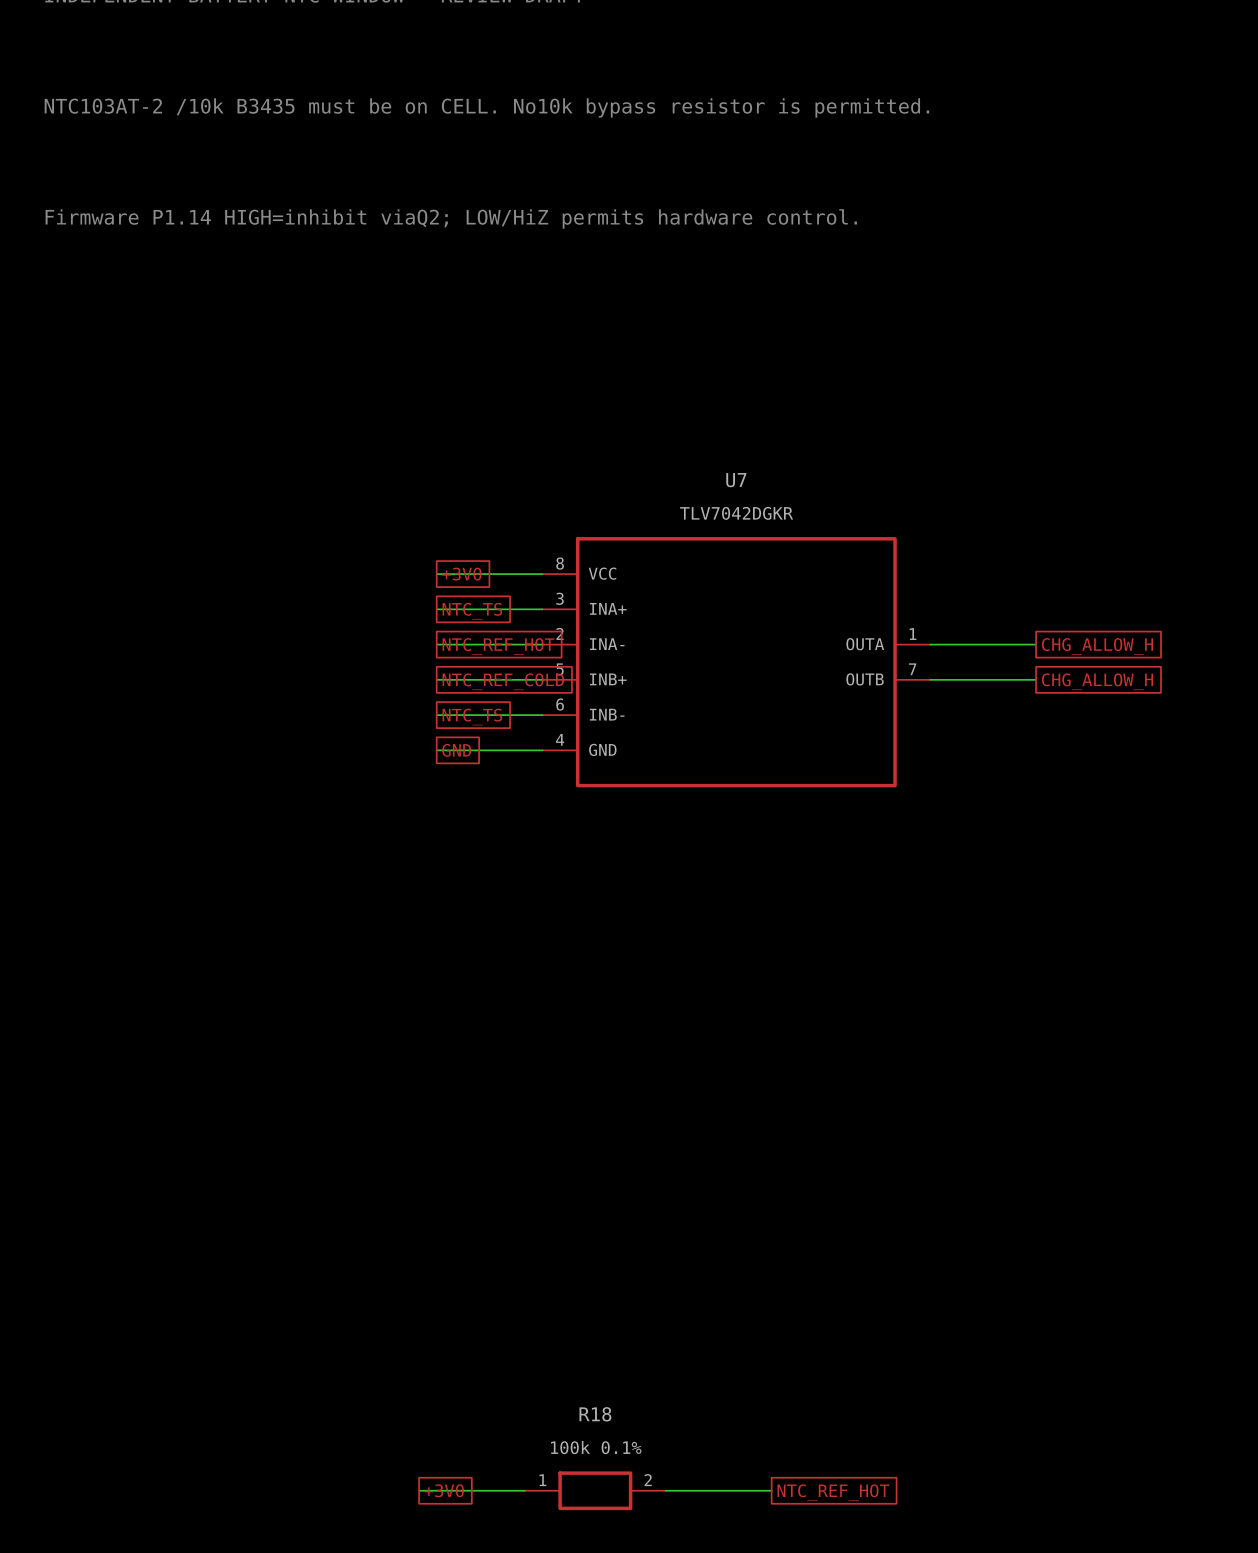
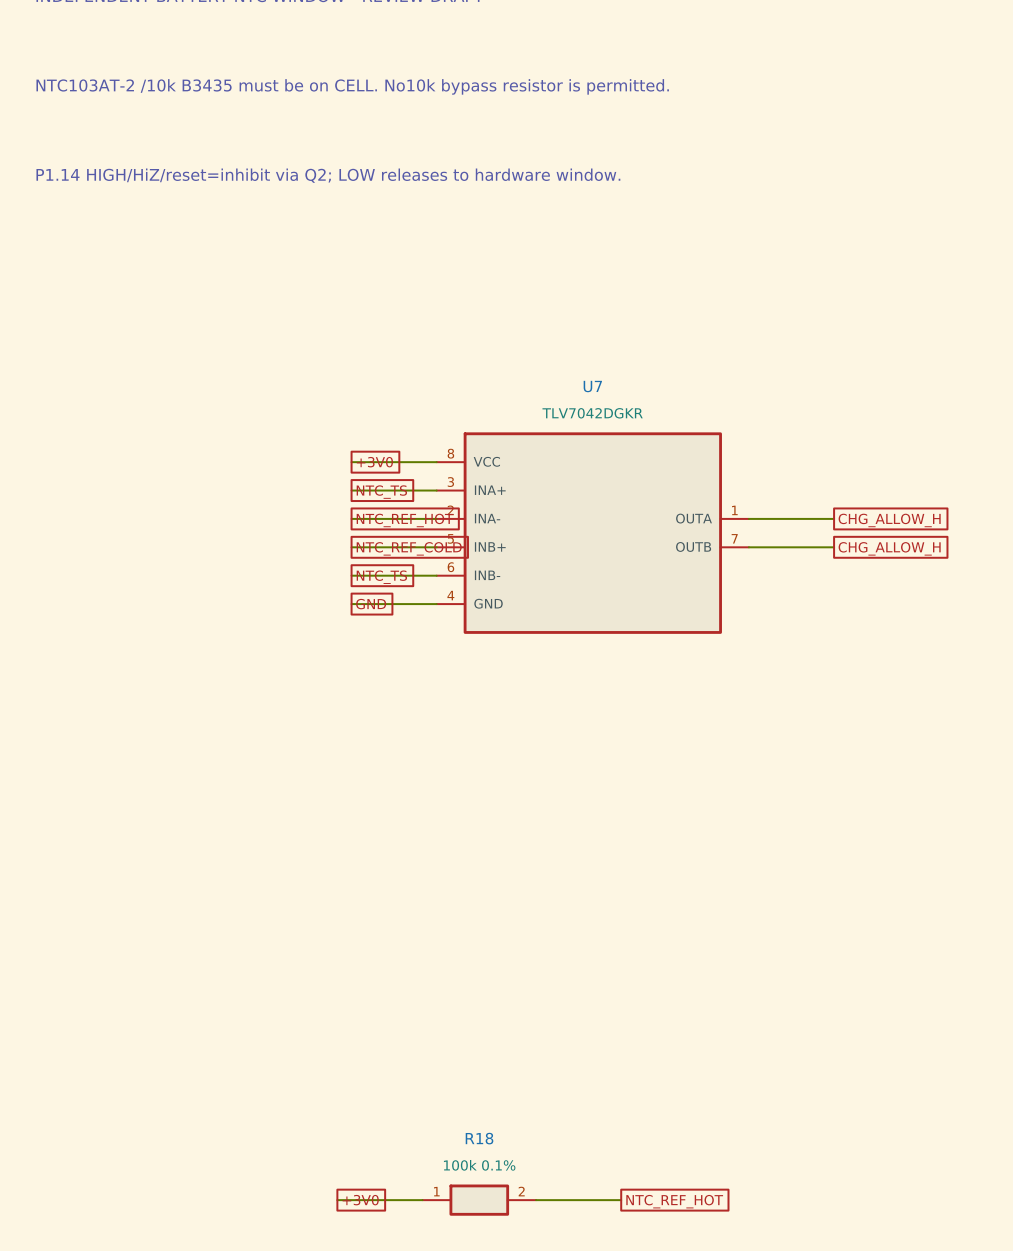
text: Firmware P1.14 HIGH=inhibit viaQ2; LOW/HiZ permits hardware control. (451, 218) -> P1.14 HIGH/HiZ/reset=inhibit via Q2; LOW releases to hardware window. (328, 175)

